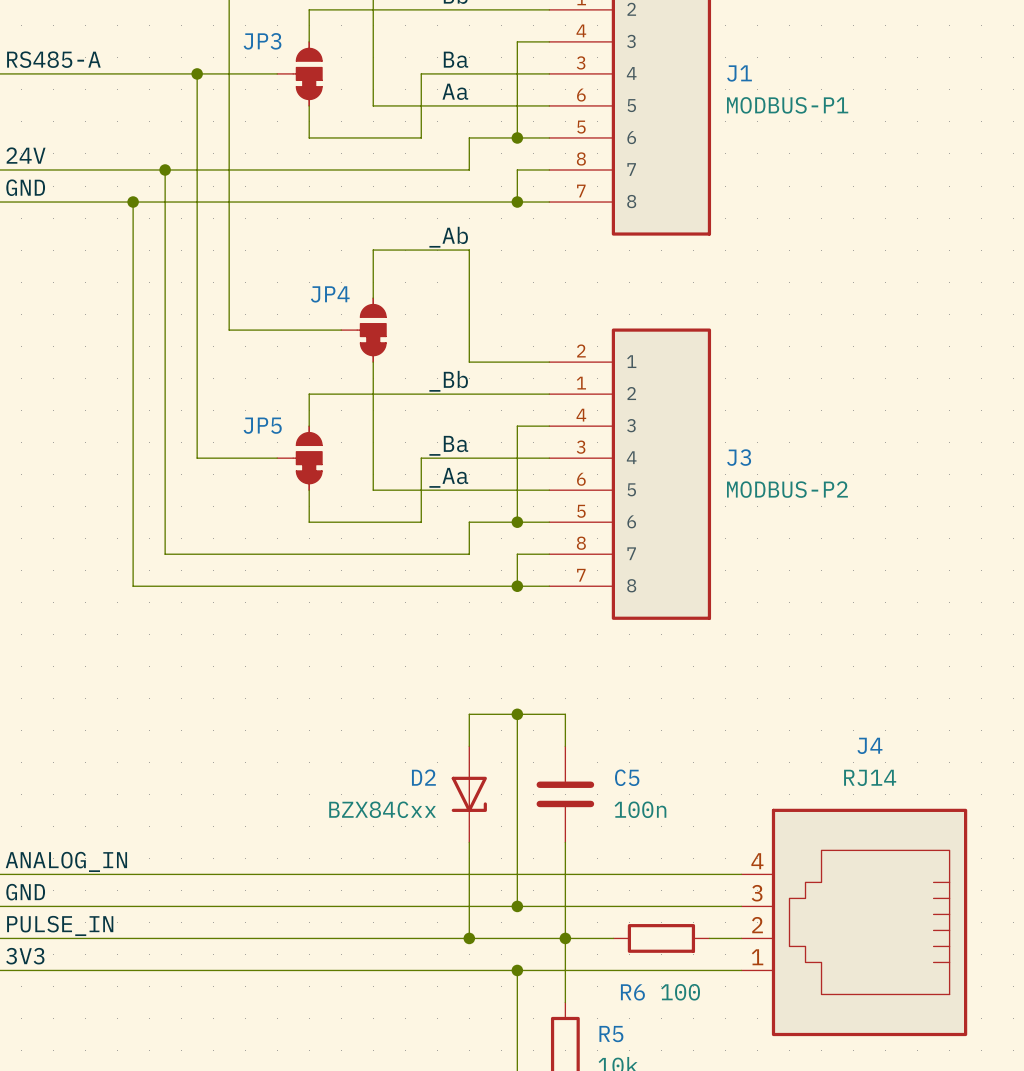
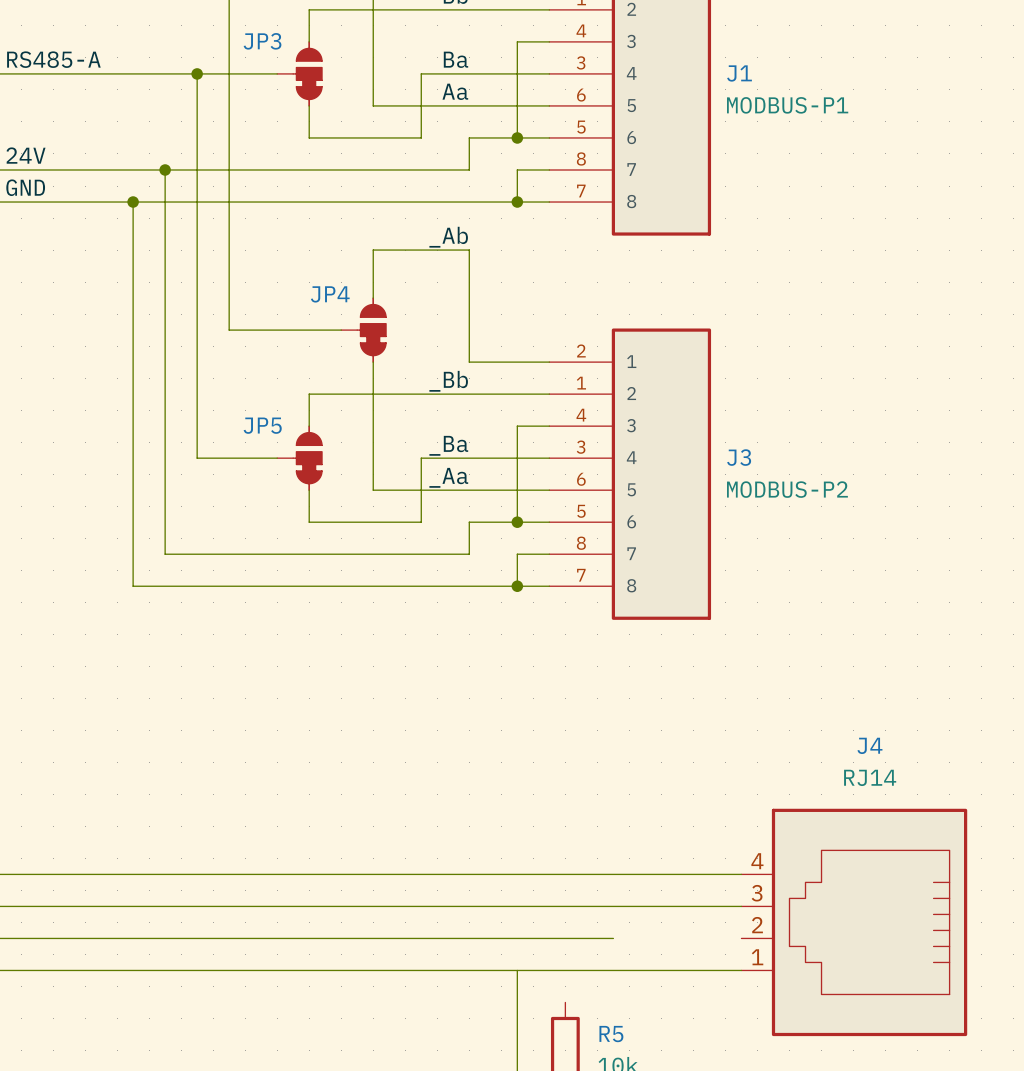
wire: (517, 714) (517, 906) -> none
junction: (517, 714) -> none
wire: (469, 746) (469, 714) (565, 714) (565, 746) -> none
D2: BZX84Cxx (469, 794) -> none
C5: 100n (565, 794) -> none
wire: (469, 842) (469, 938) -> none
wire: (565, 842) (565, 1002) -> none
label: ANALOG_IN (66, 861) -> none
label: GND (25, 892) -> none
junction: (517, 906) -> none
label: PULSE_IN (60, 925) -> none
junction: (469, 938) -> none
junction: (565, 938) -> none
R6: 100 (661, 938) -> none
wire: (709, 938) (741, 938) -> none
label: 3V3 (25, 956) -> none
junction: (517, 970) -> none

